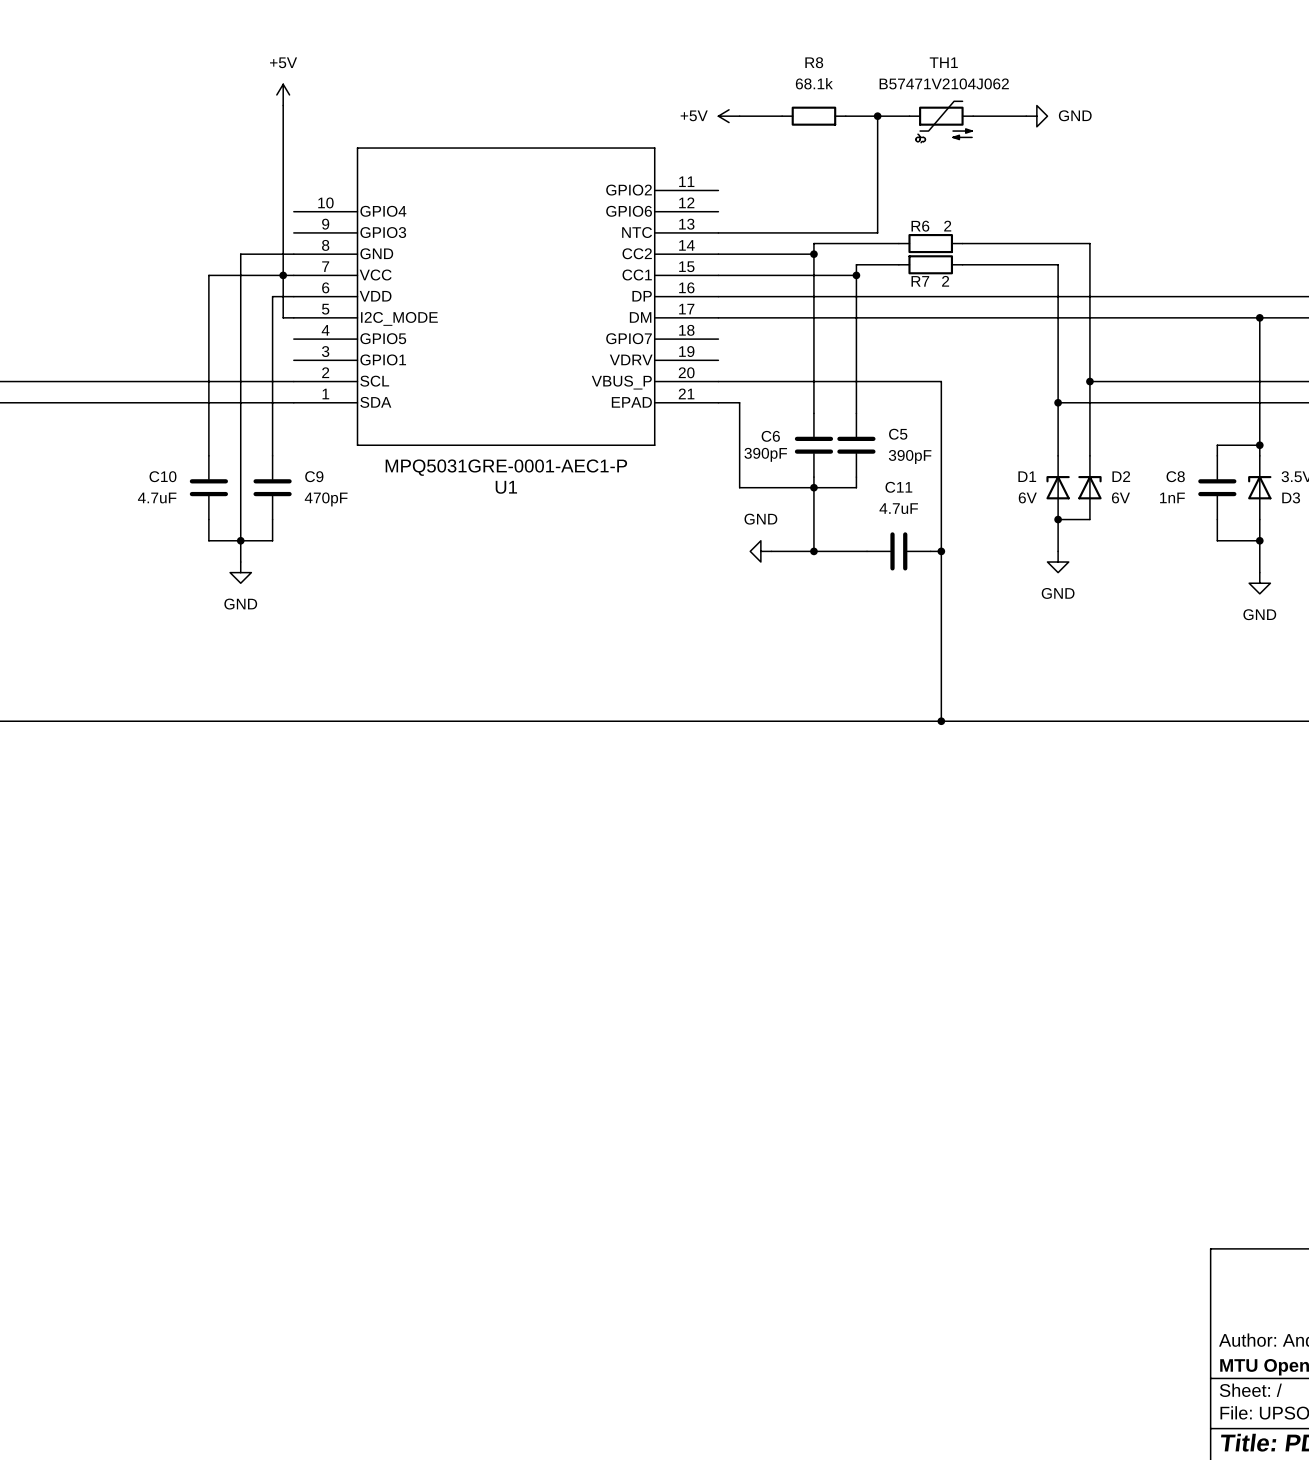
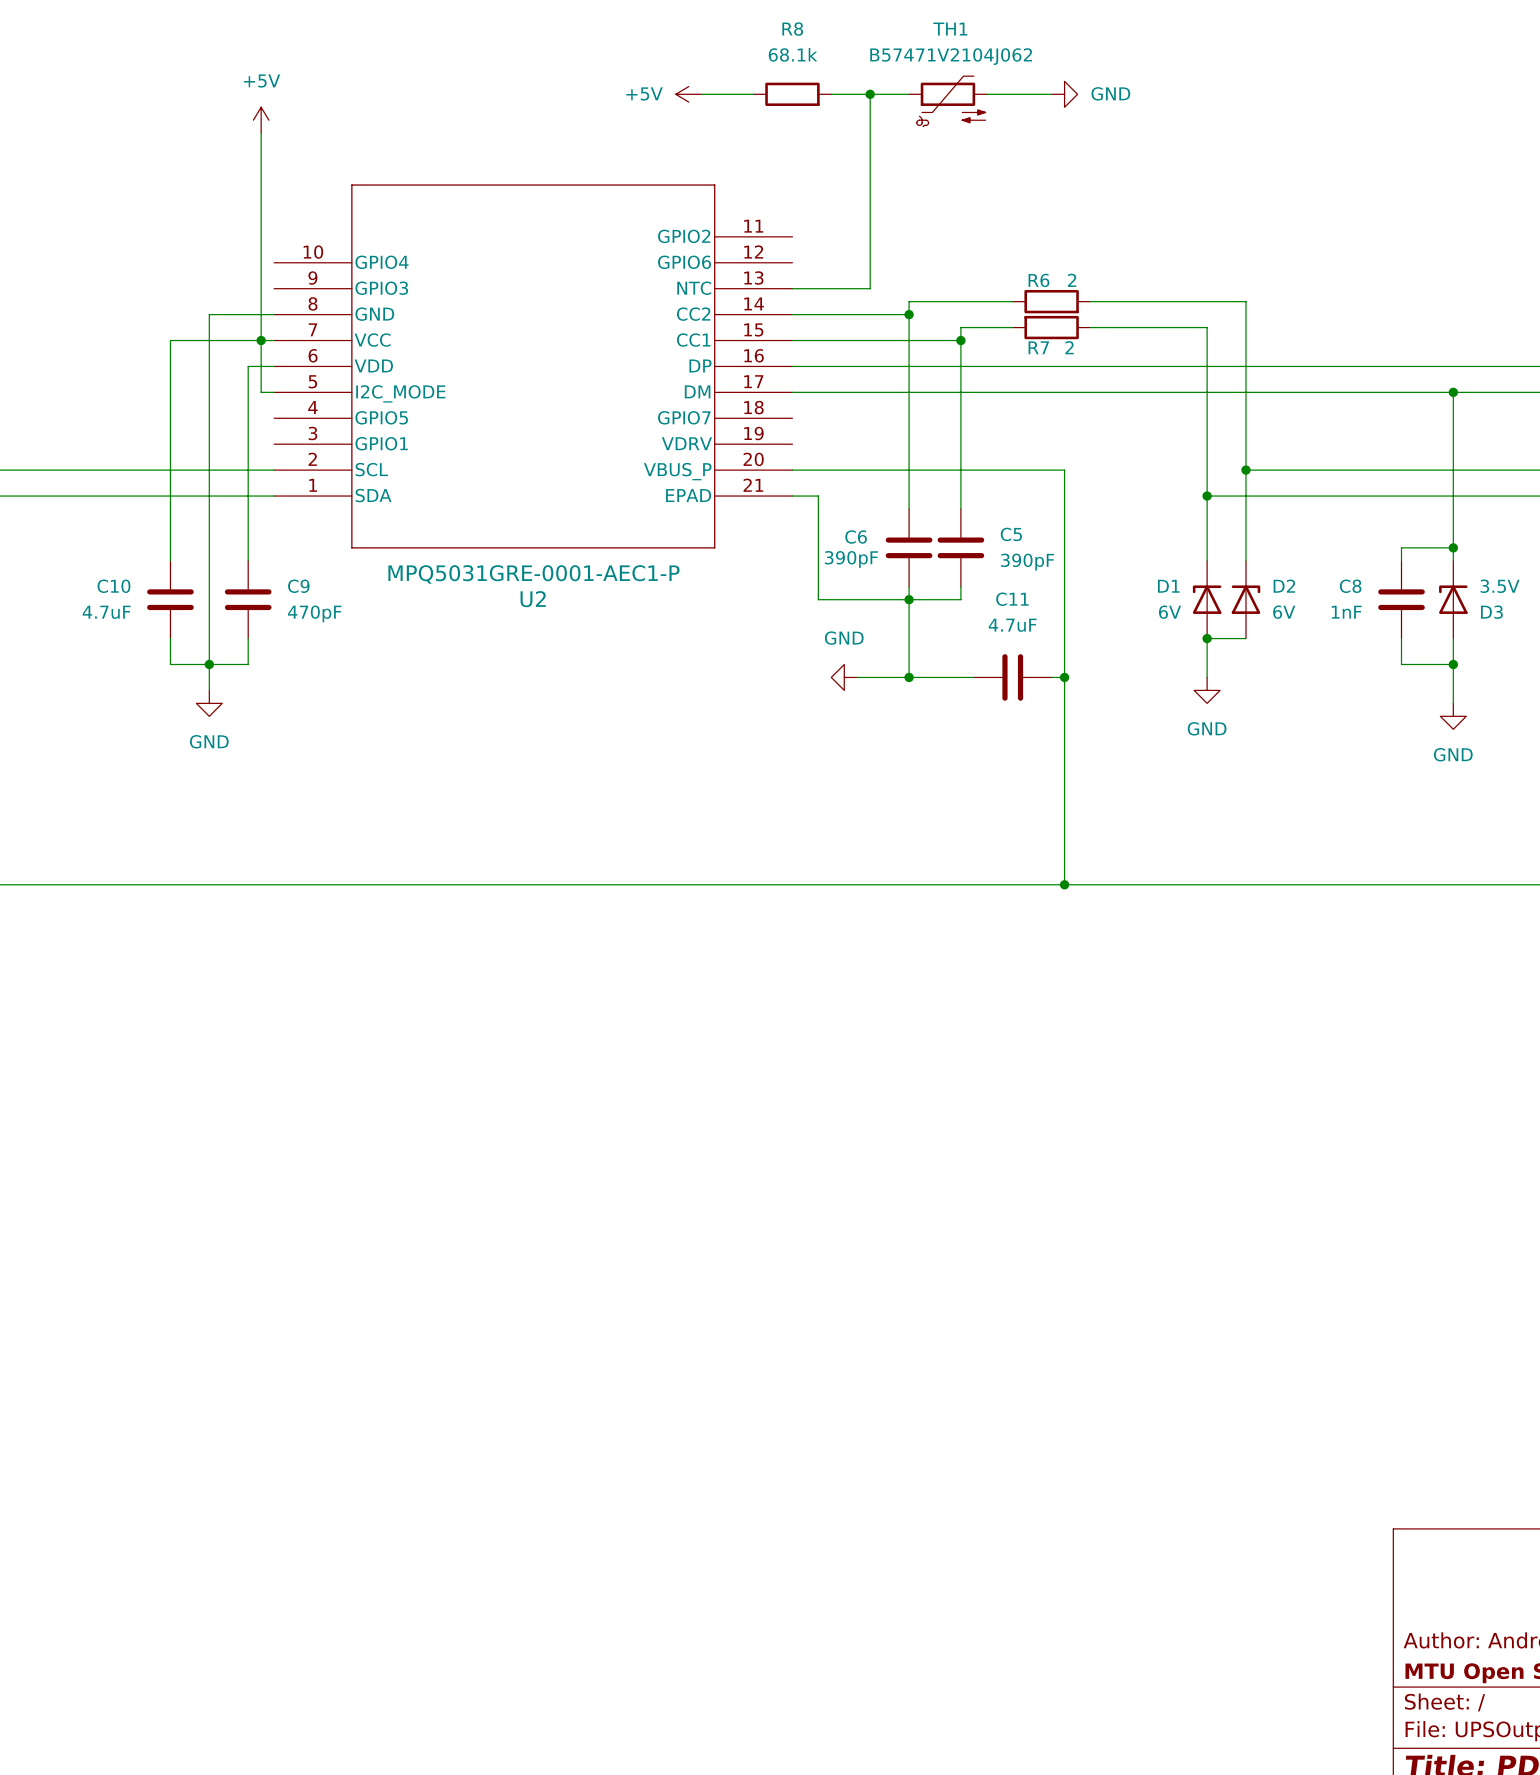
junction: none -> (870, 94)
power symbol position: +5V (729, 116) -> +5V (688, 94)
wire: (739, 116) (782, 116) -> (701, 94) (753, 94)
R8 position: (813, 116) -> (792, 94)
wire: (845, 116) (909, 116) -> (831, 94) (909, 94)
wire: (877, 116) (877, 232) (782, 232) -> (870, 94) (870, 288)
junction: (877, 116) -> none
wire: (973, 116) (1026, 116) -> (986, 94) (1051, 94)
power symbol position: GND (1036, 116) -> GND (1064, 94)
TH1 position: (941, 122) -> (947, 101)
U1 name: U1 (506, 487) -> U2 (533, 599)

